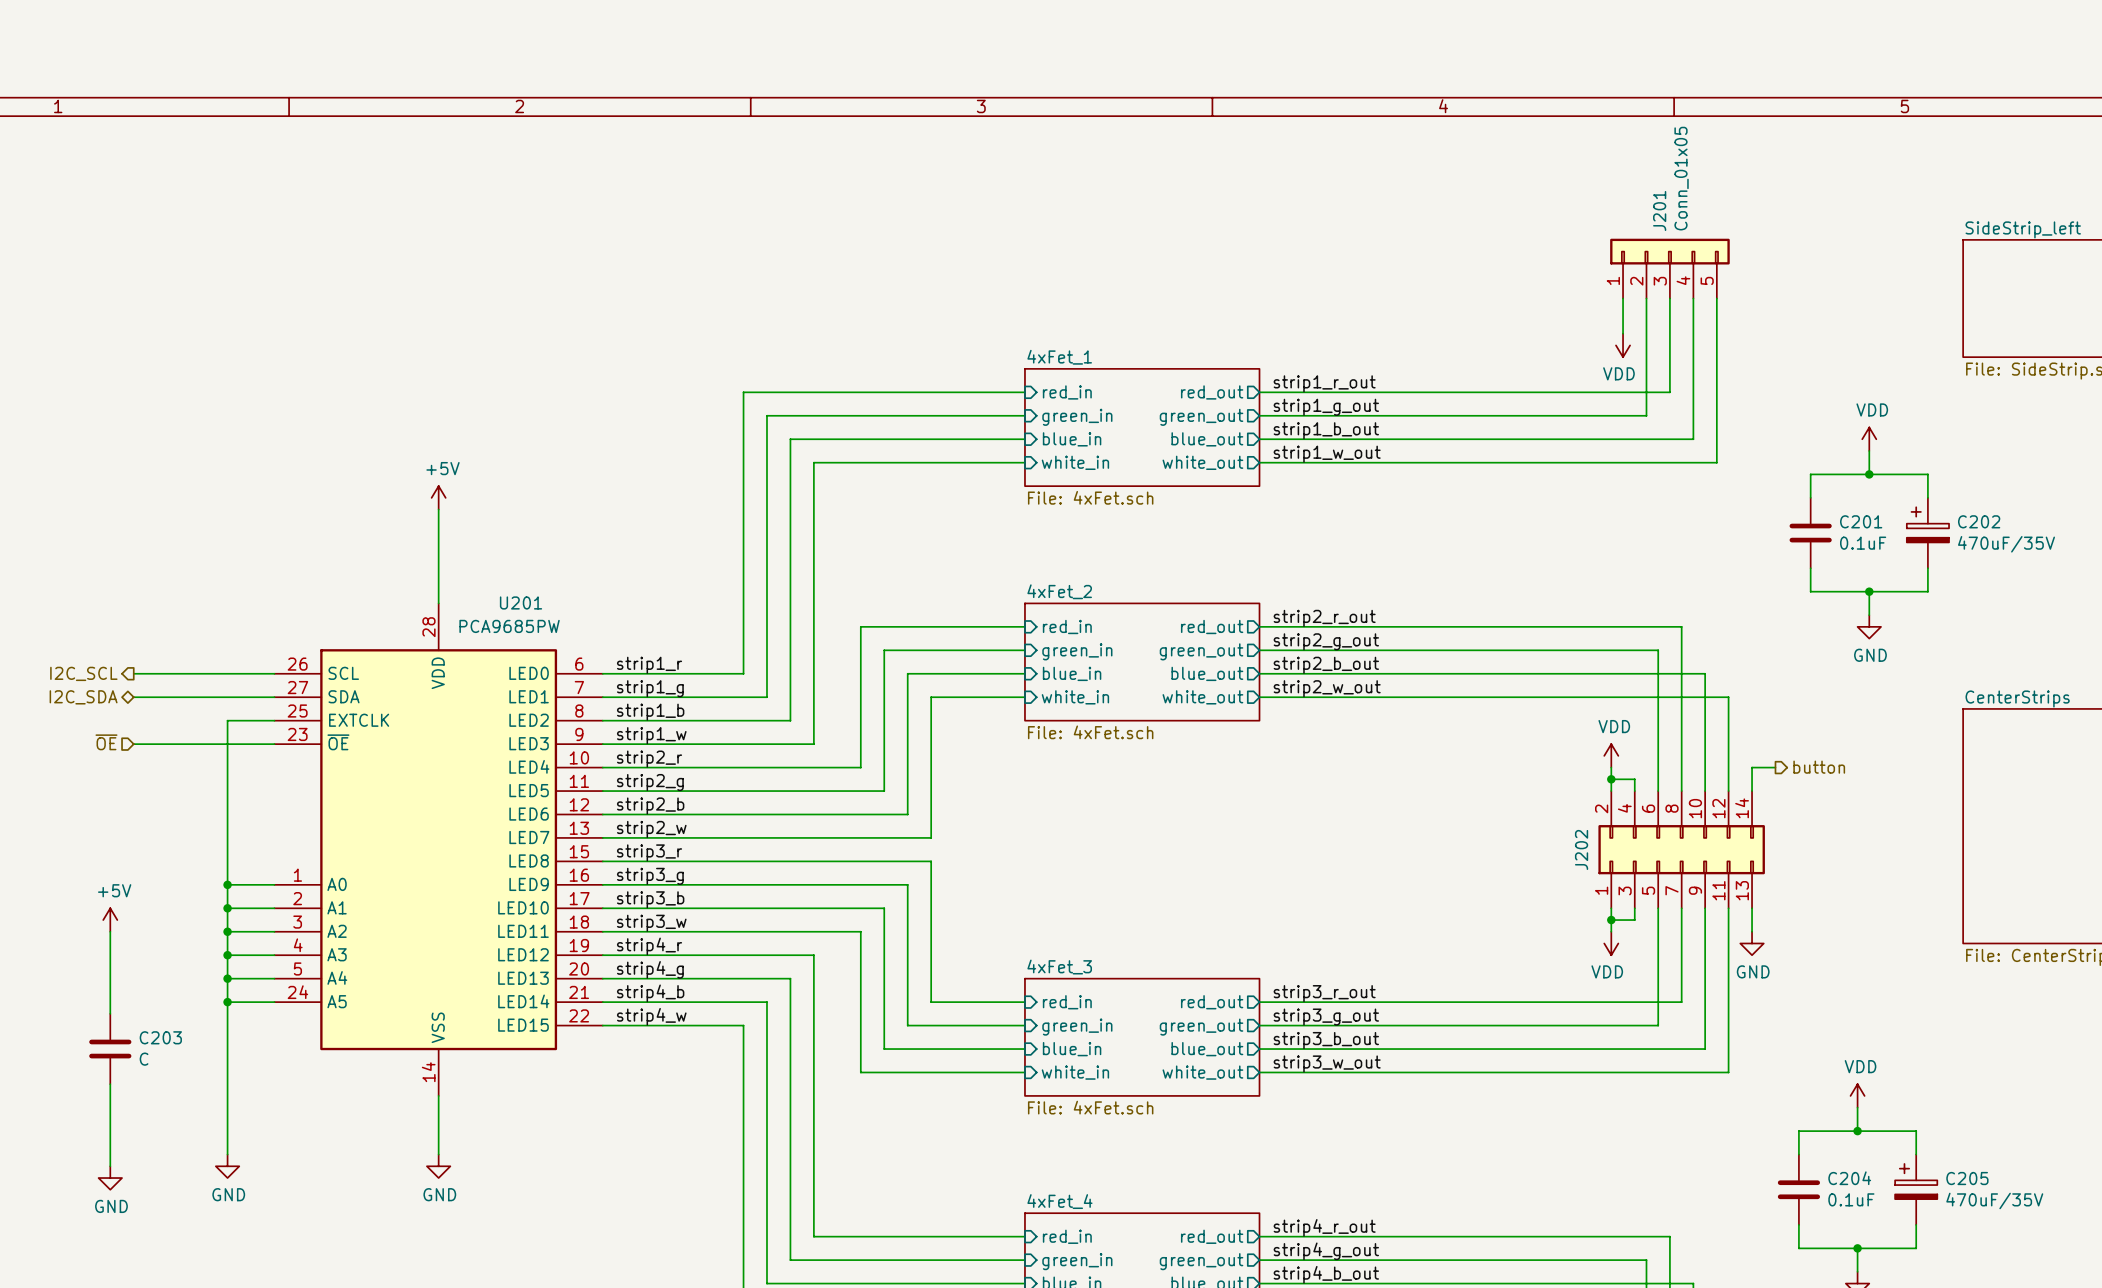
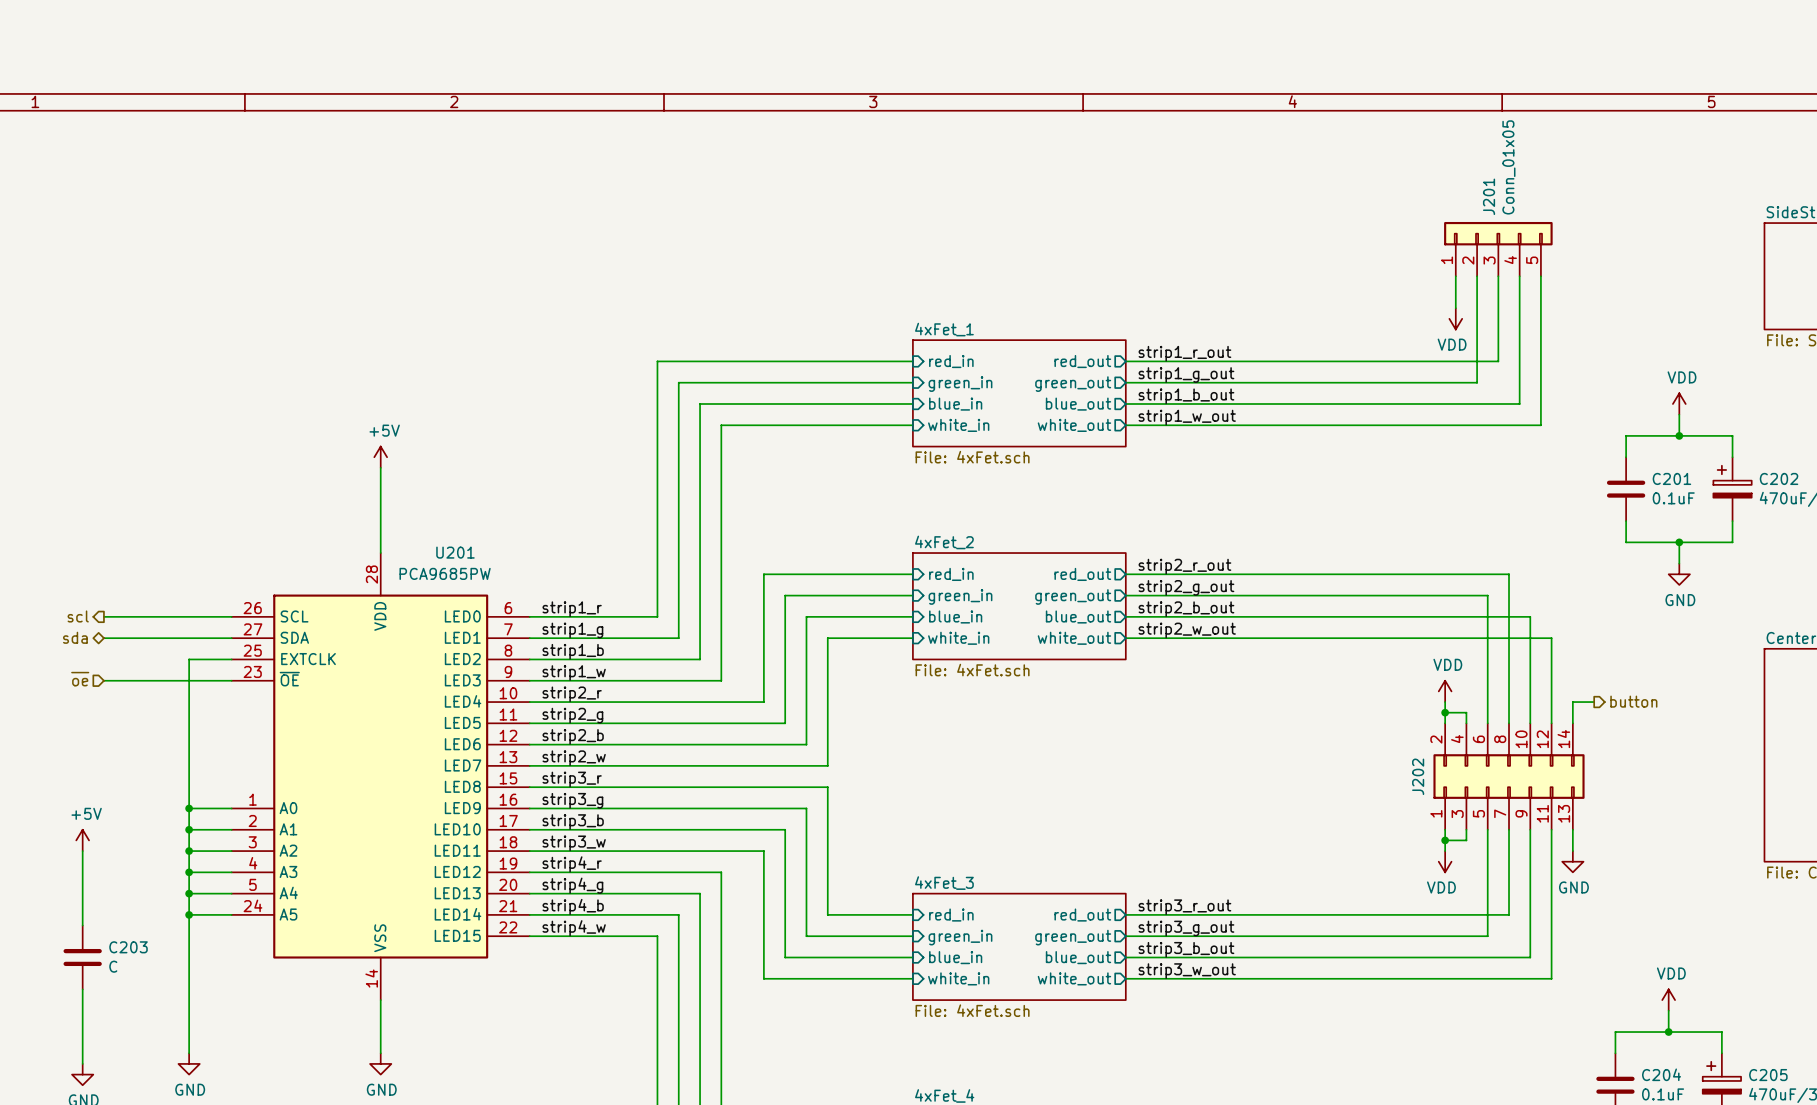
hierarchical label: I2C_SCL (83, 673) -> scl (78, 616)
hierarchical label: I2C_SDA (83, 697) -> sda (75, 637)
hierarchical label: ~{OE} (106, 742) -> ~{oe} (80, 679)

